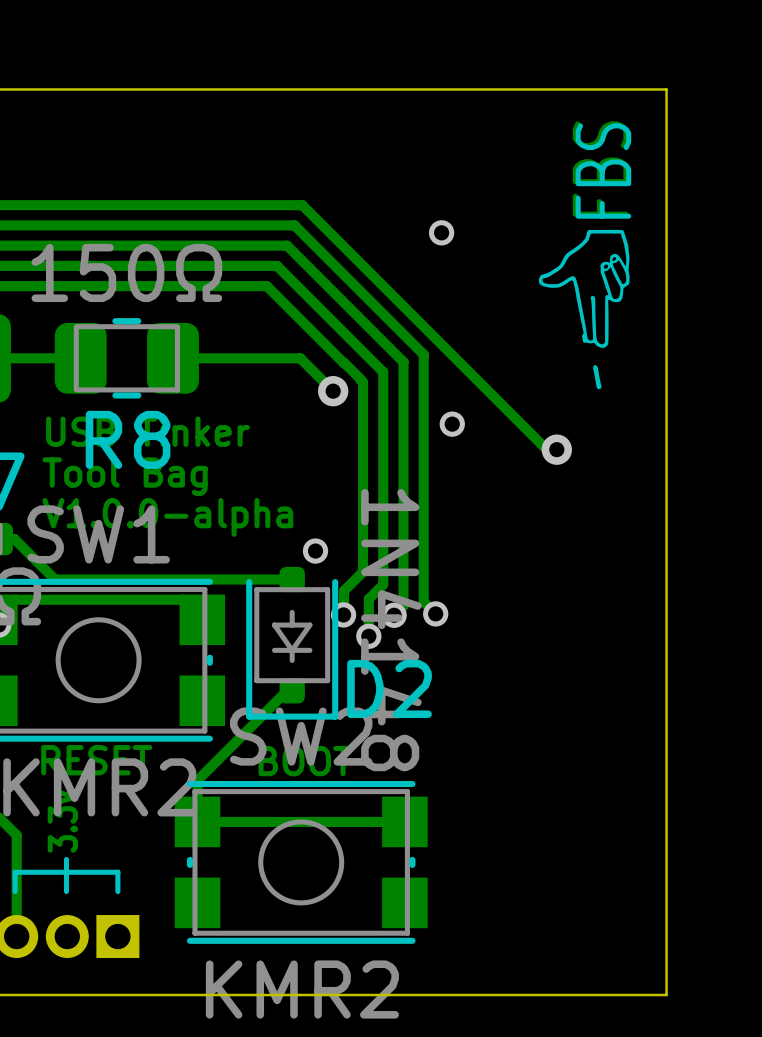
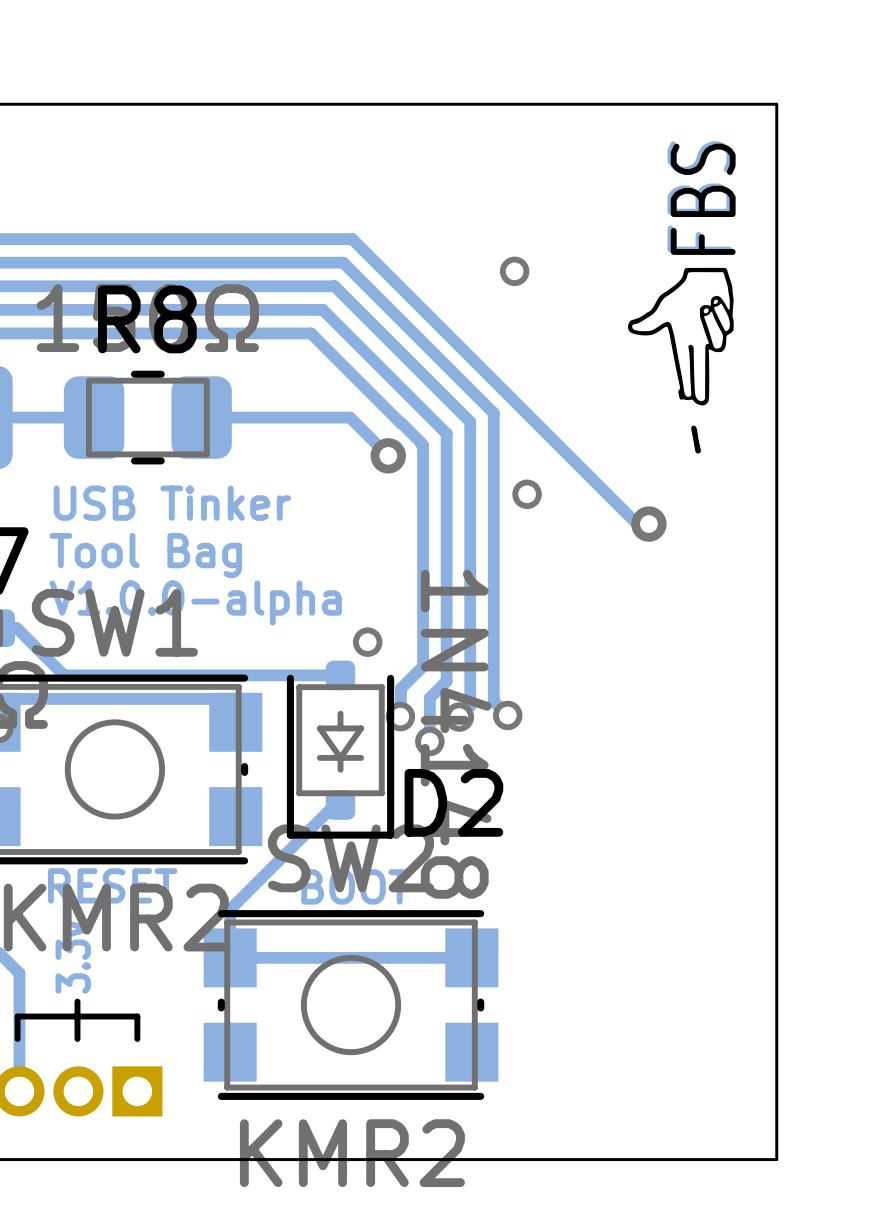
R8 name position: R8 (128, 439) -> R8 (147, 319)

